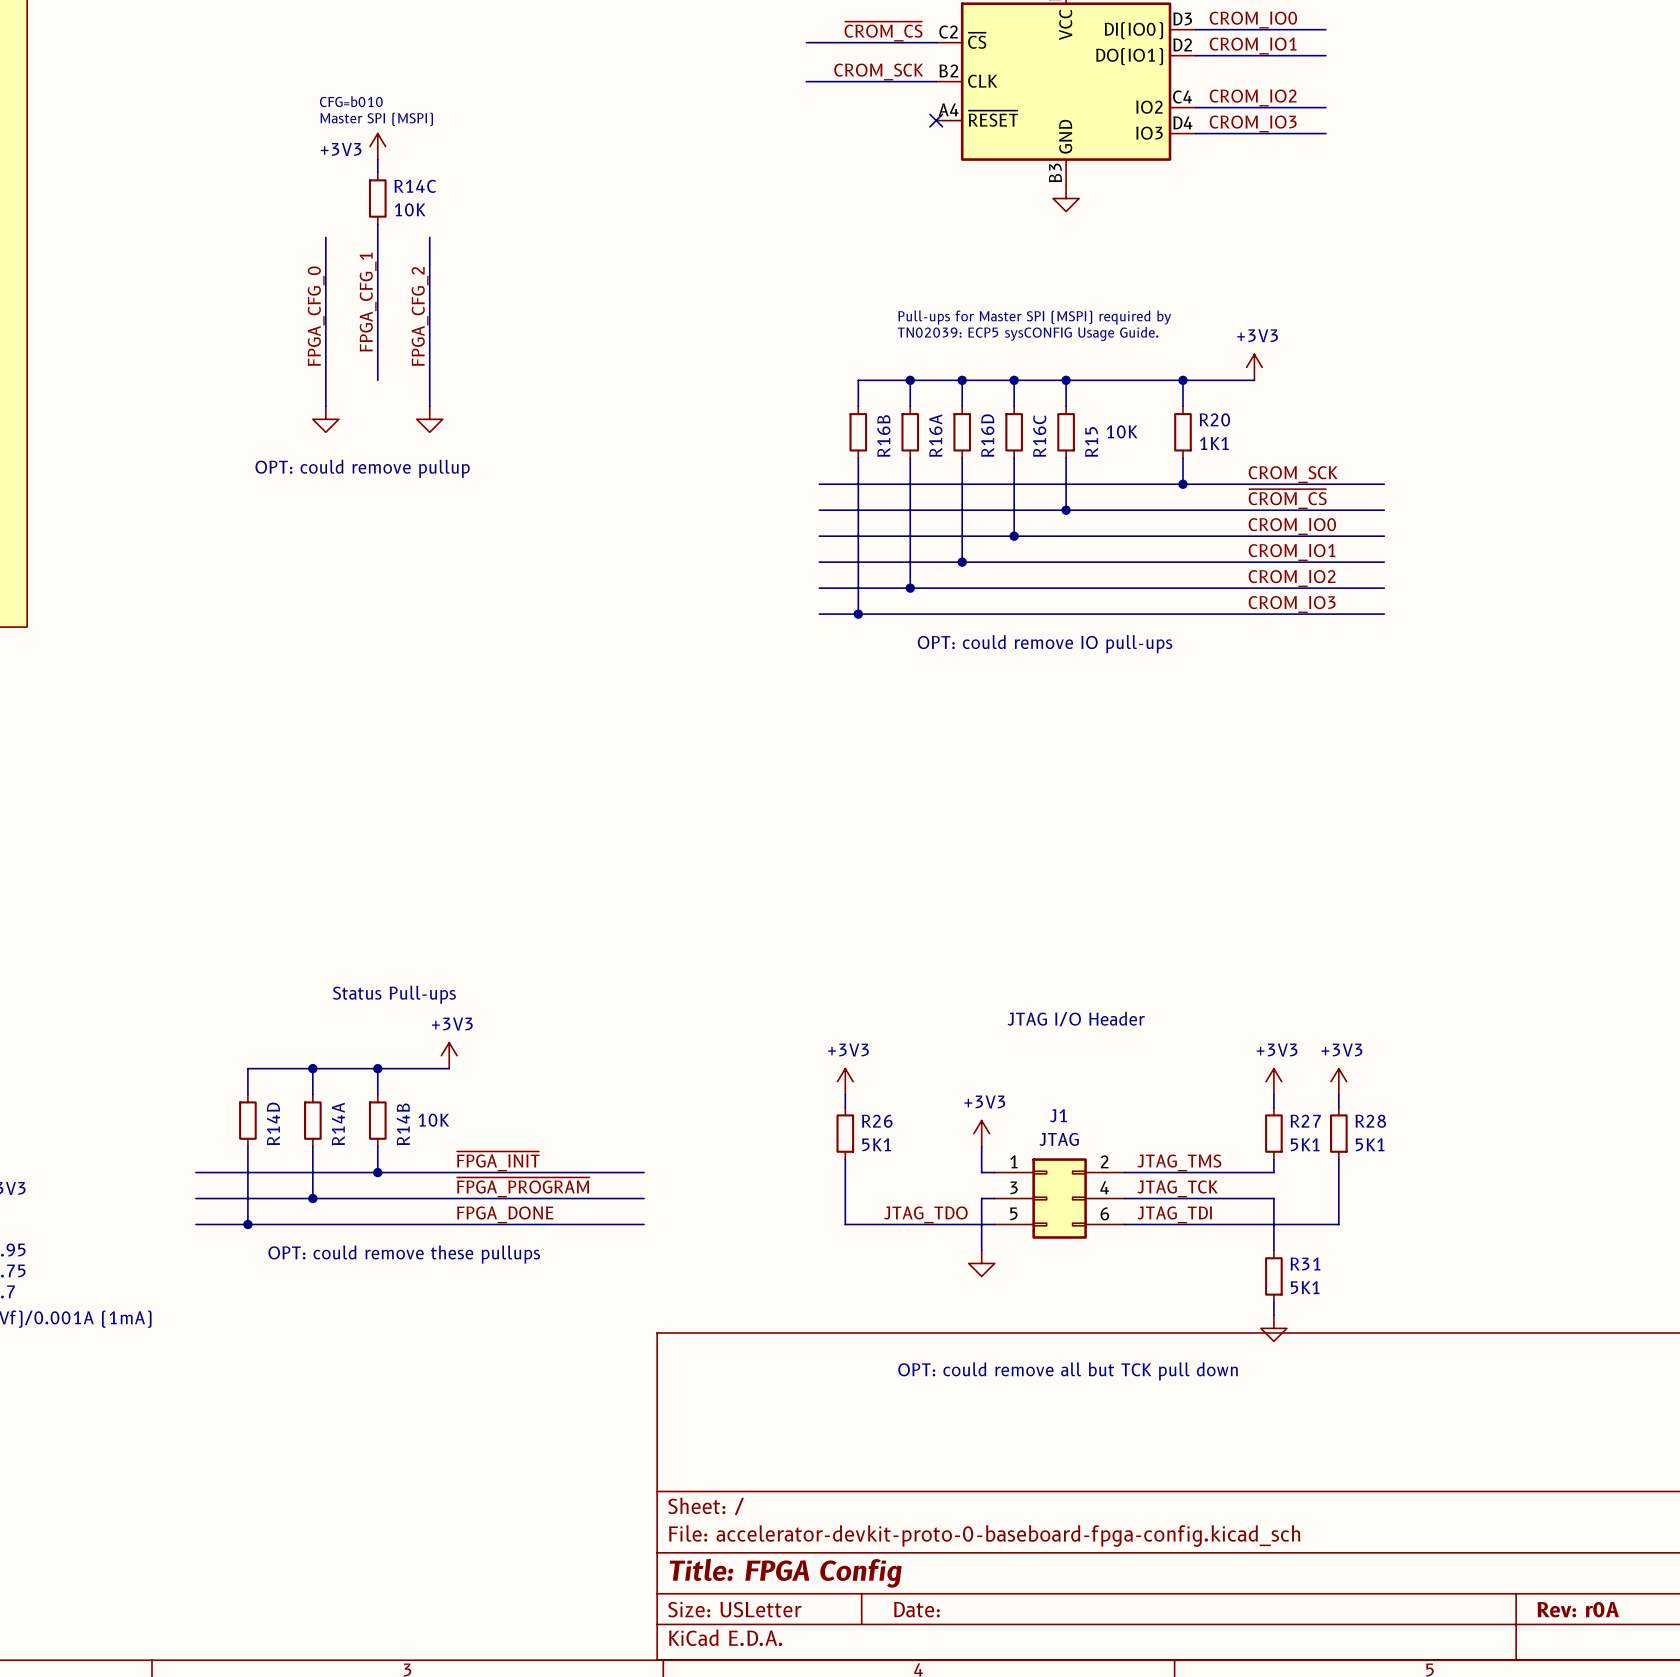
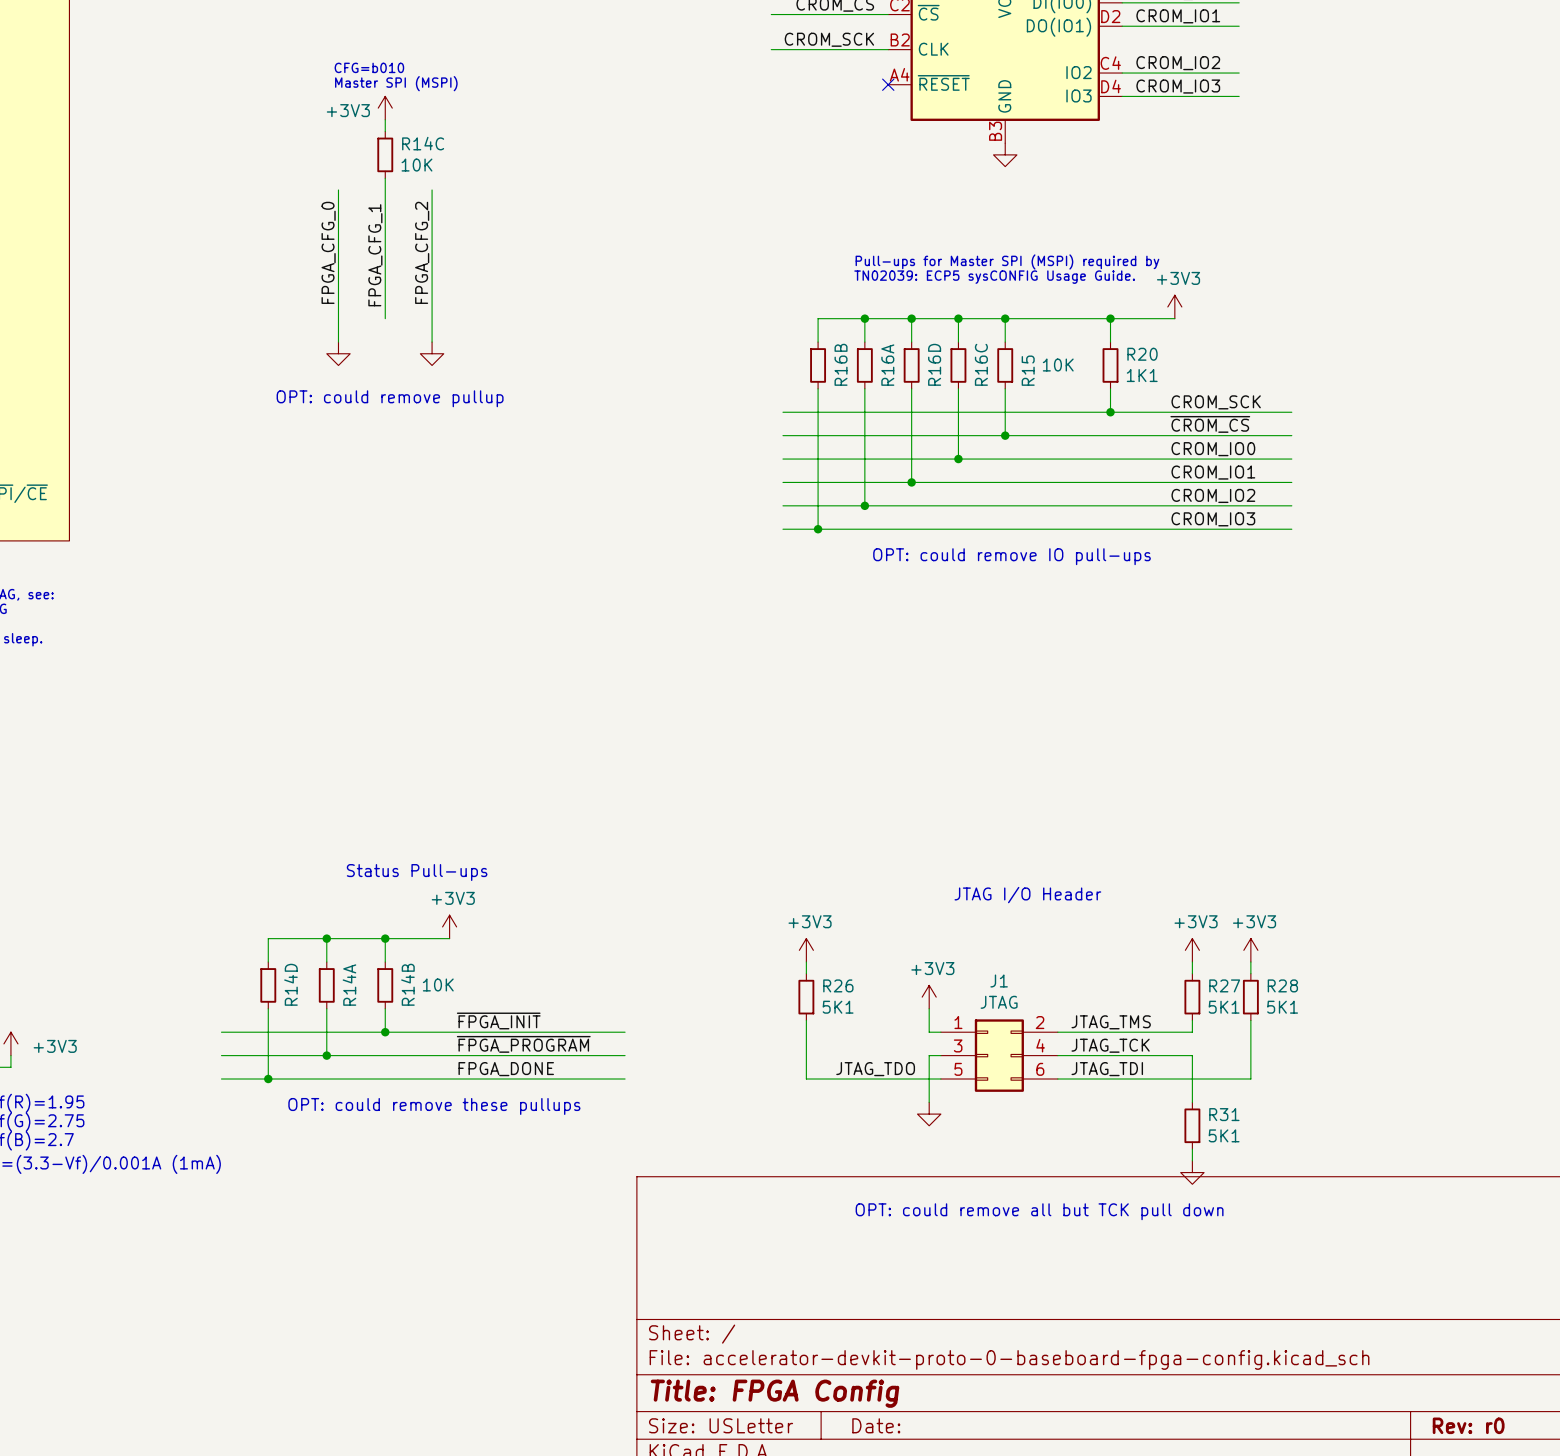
title block: Rev: r0A (1578, 1609) -> Rev: r0 (1468, 1425)

